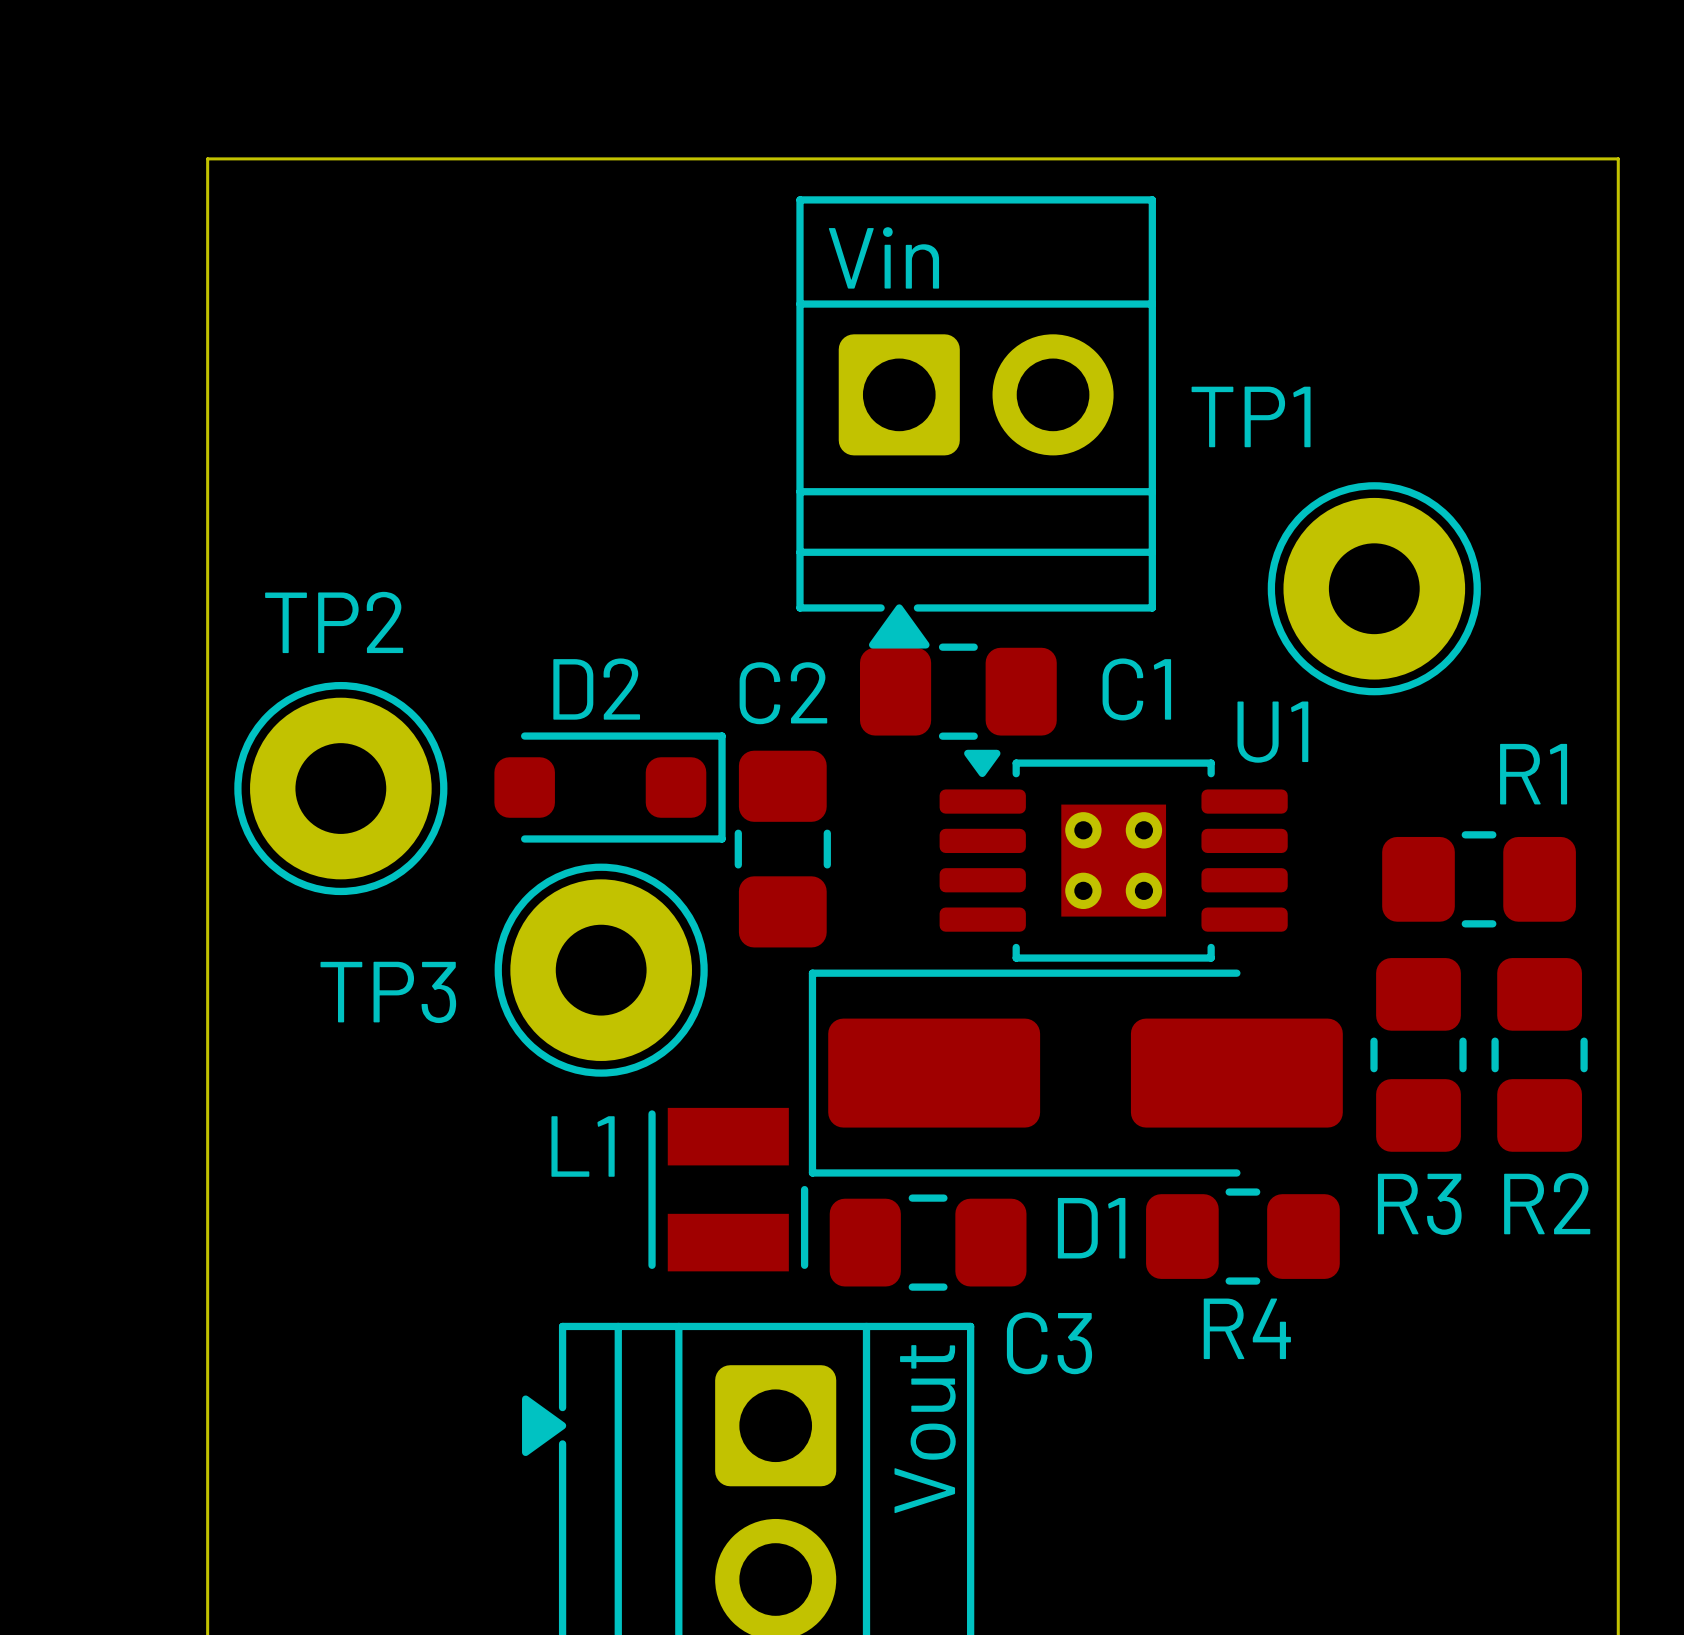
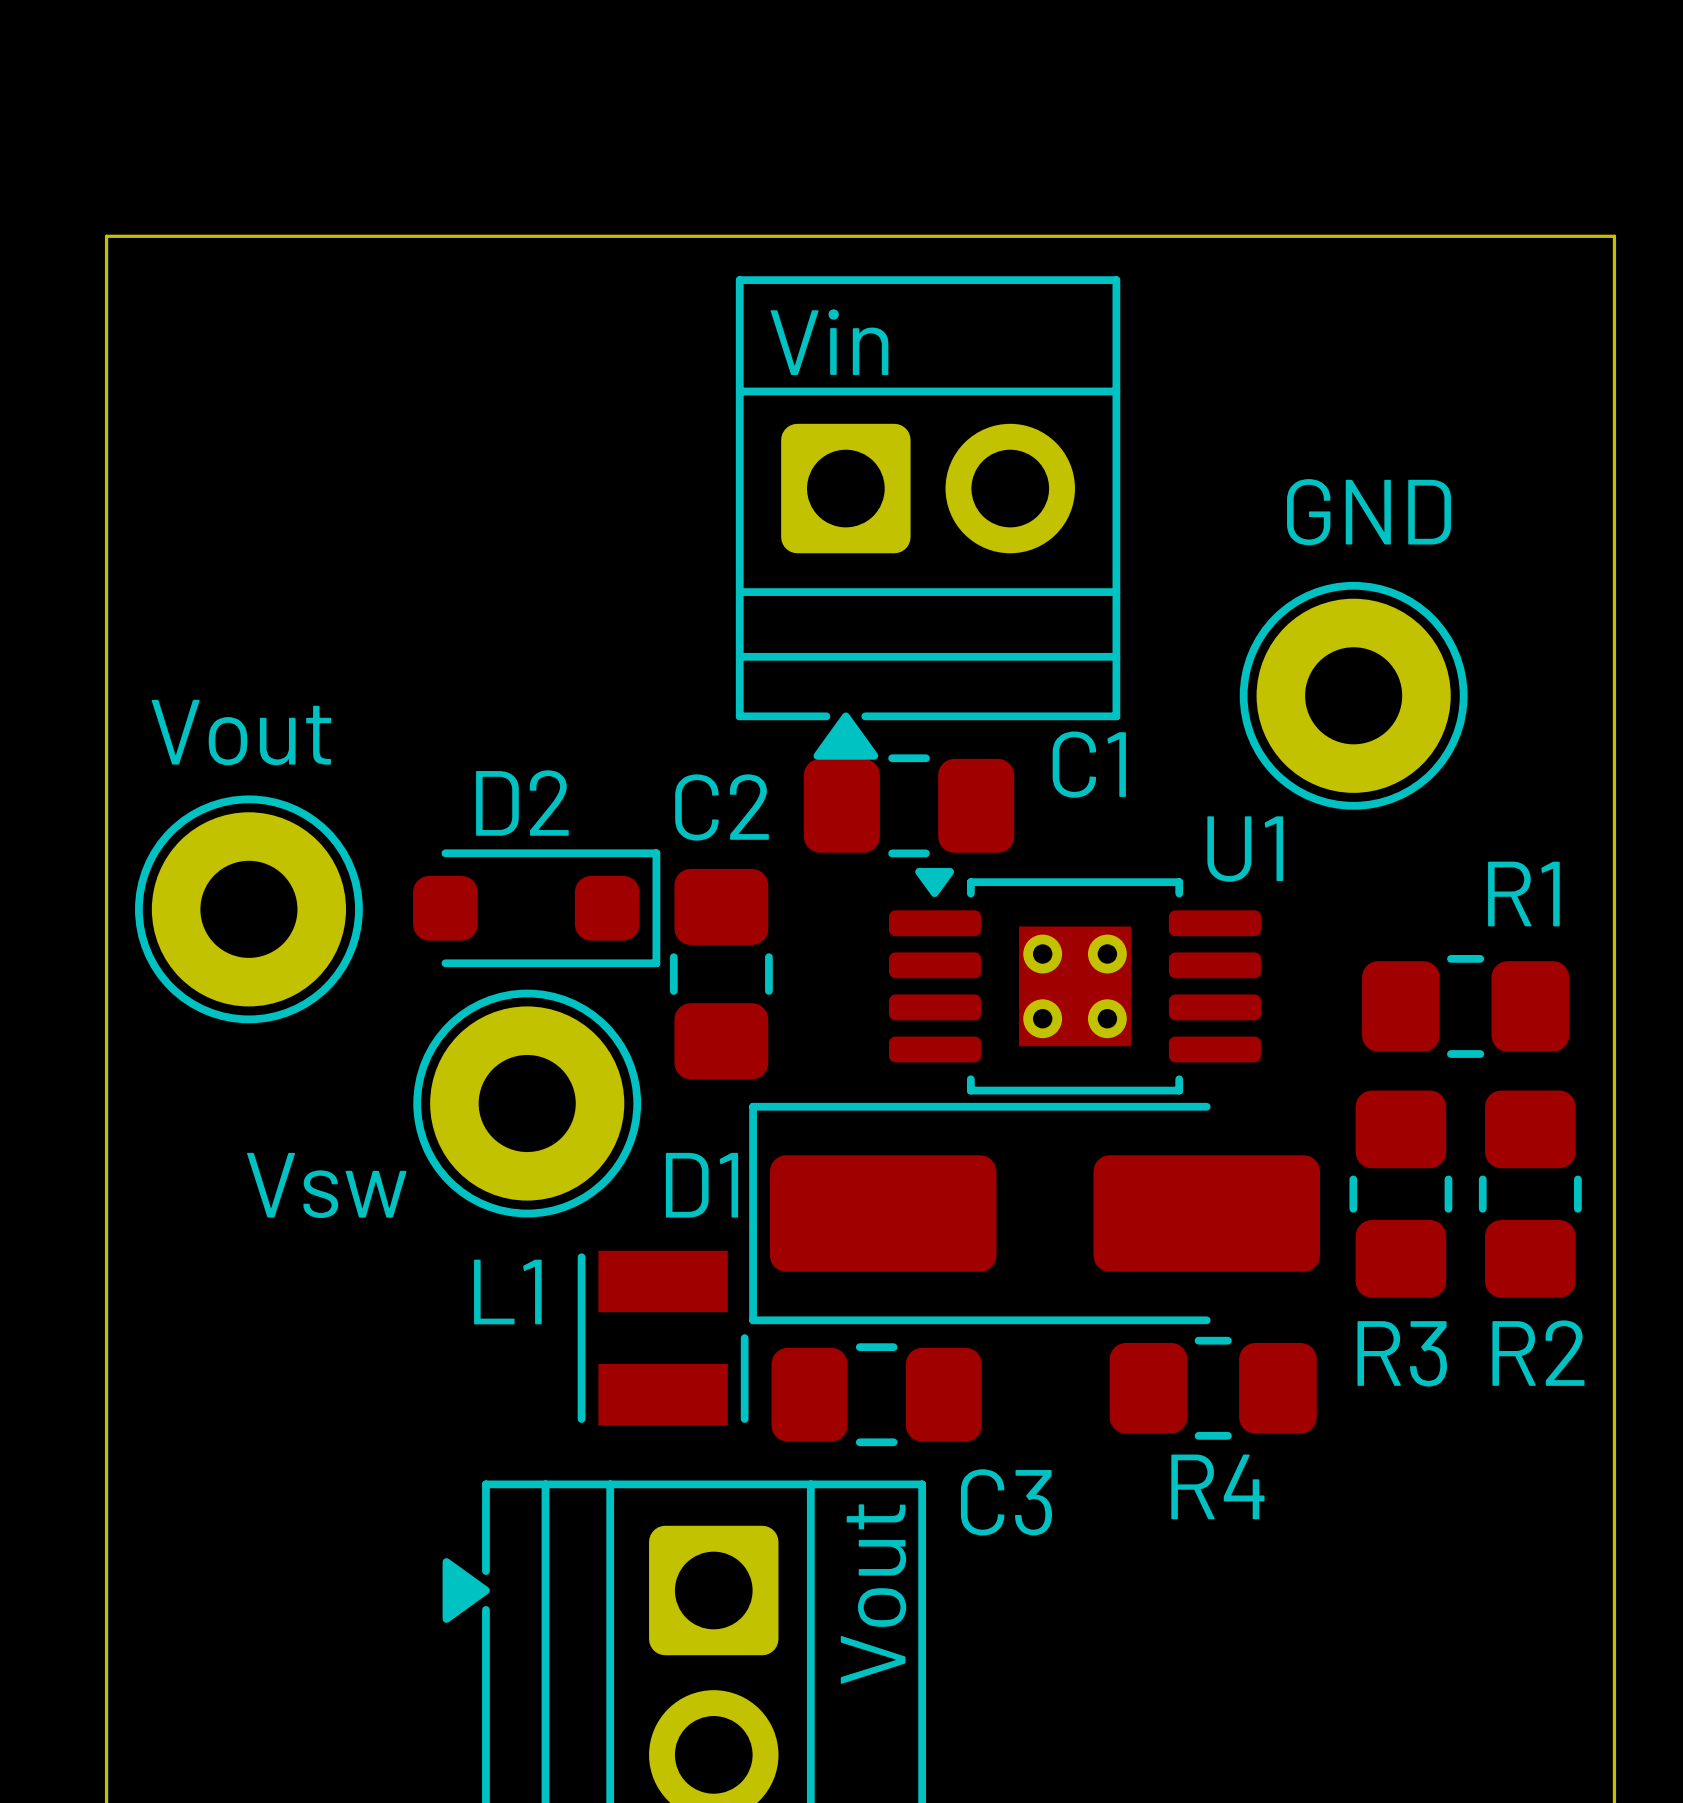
TP1 name: TP1 (1251, 416) -> GND (1368, 512)
TP2 name: TP2 (334, 622) -> Vout (241, 732)
C1 name position: C1 (1136, 689) -> C1 (1089, 764)
TP3 name: TP3 (388, 992) -> Vsw (326, 1185)
D1 name position: D1 (1091, 1228) -> D1 (702, 1185)

